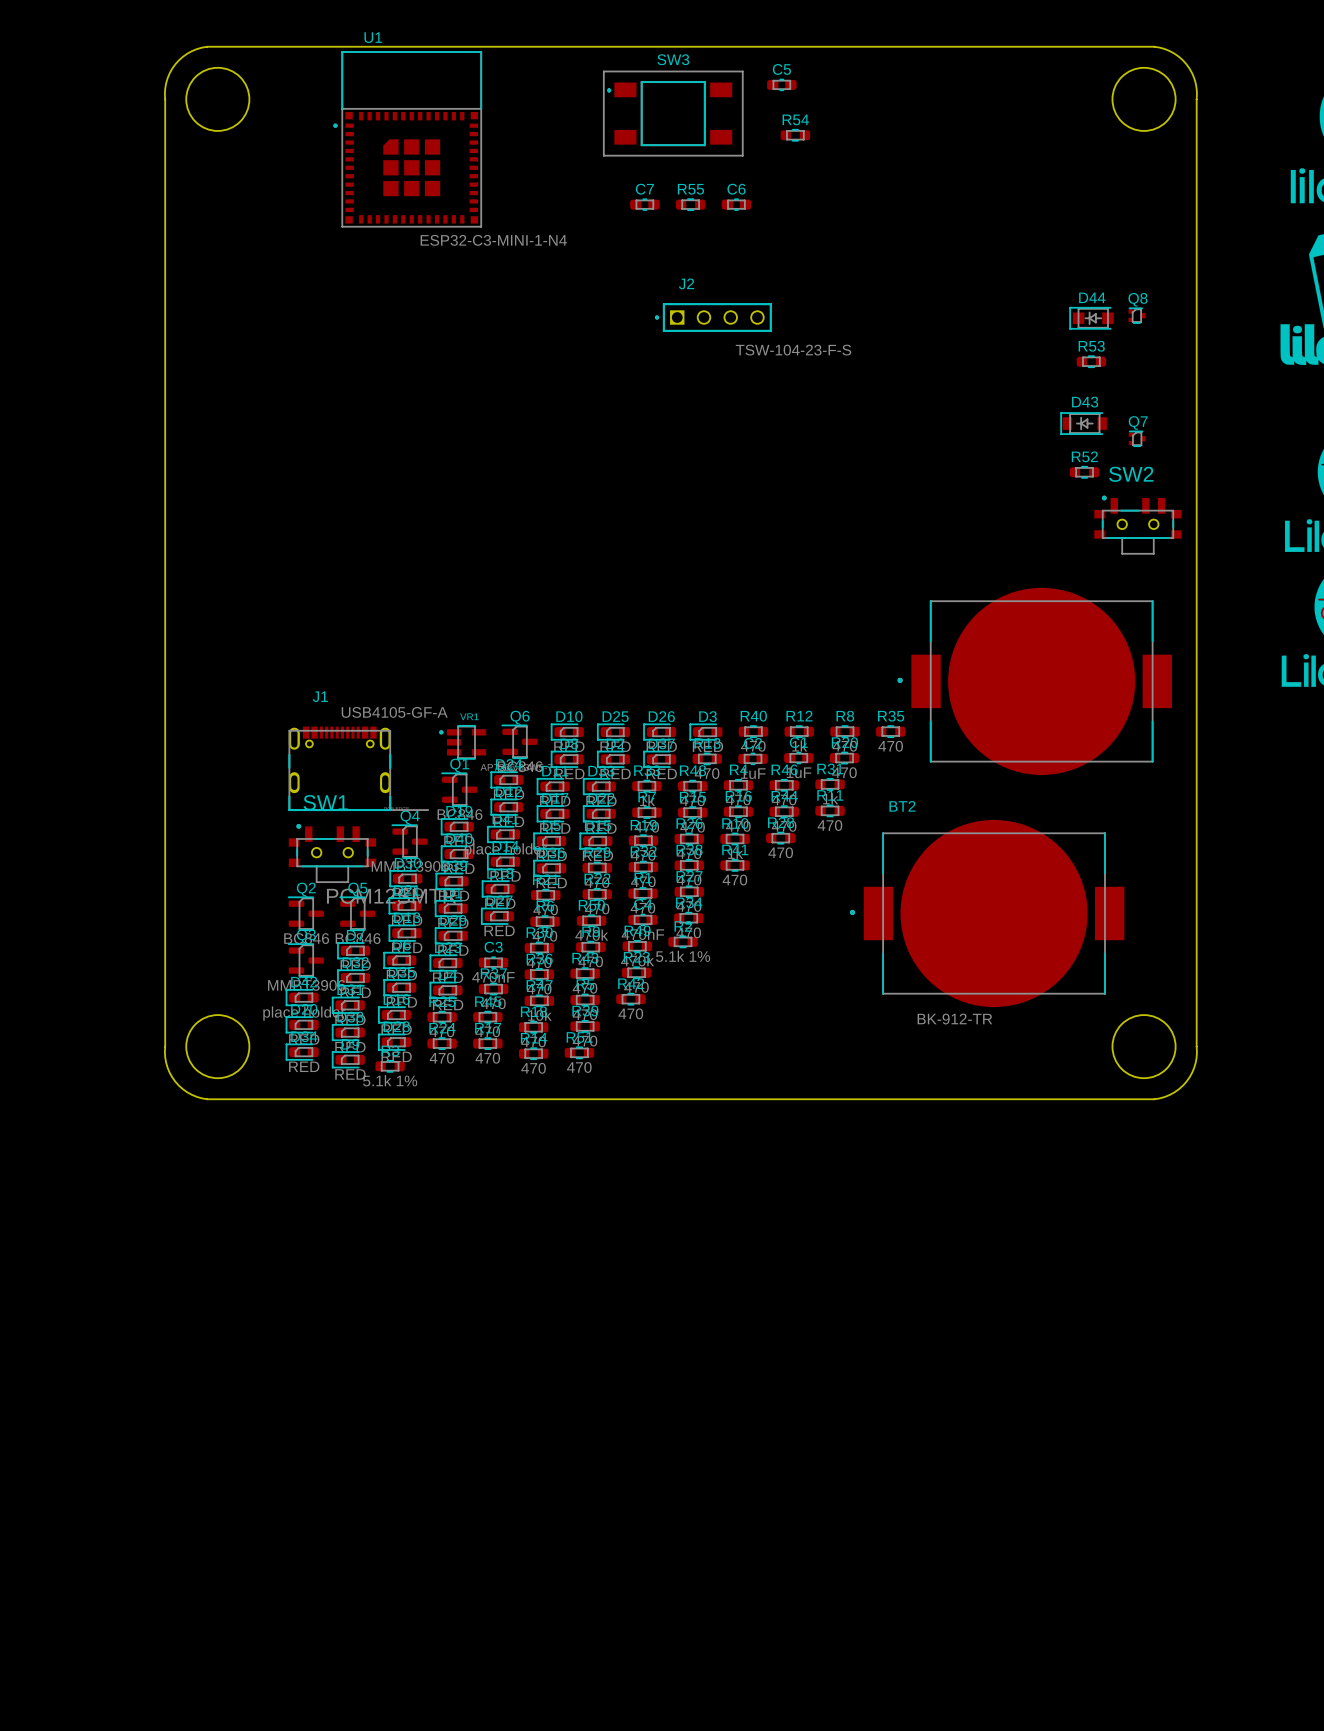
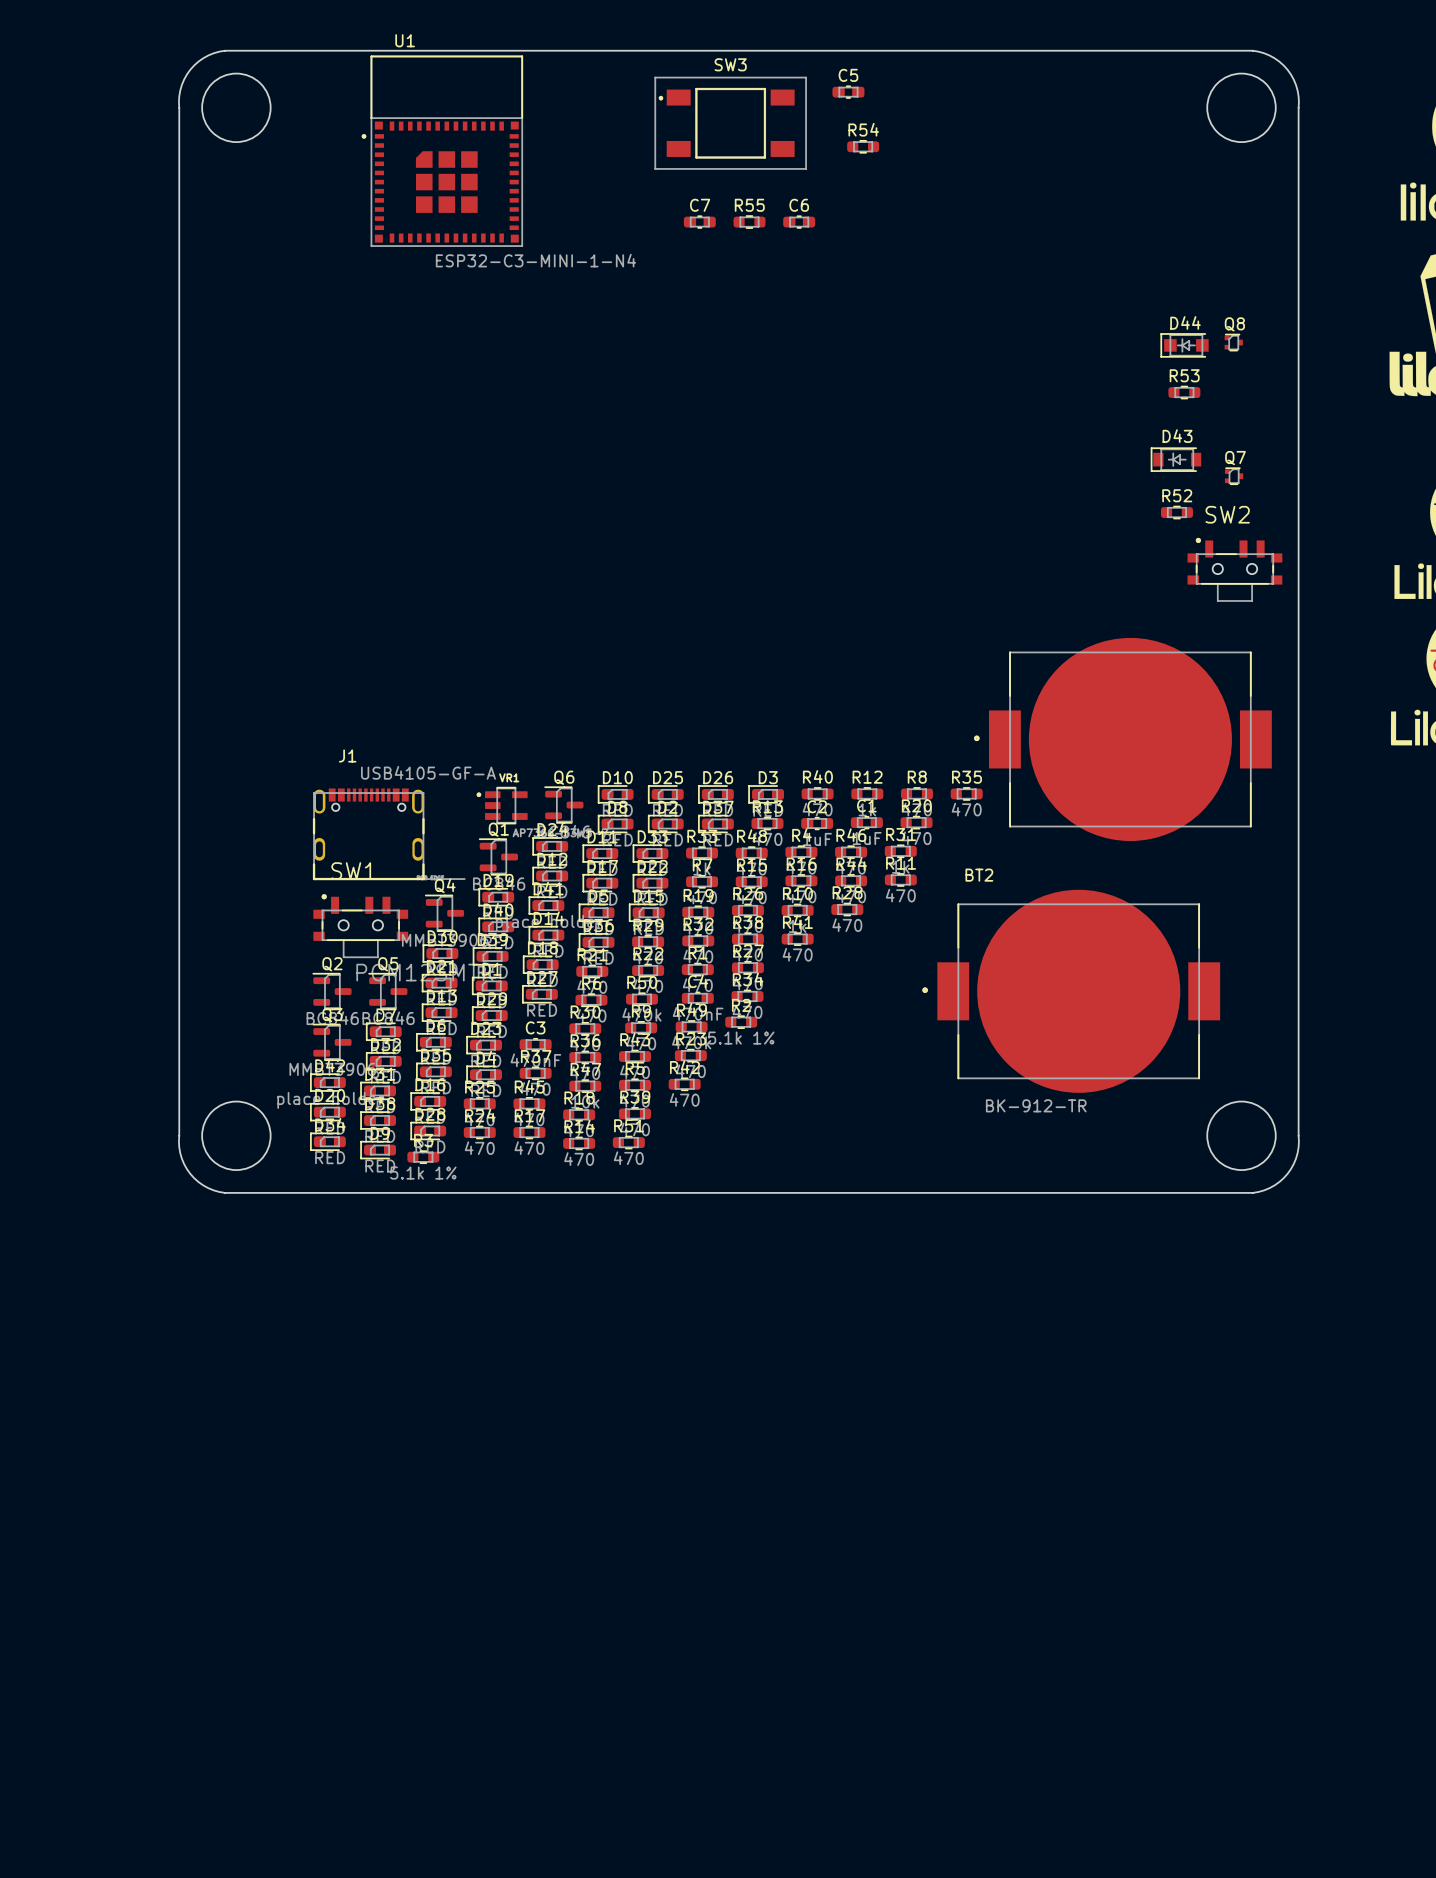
J2: TSW-104-23-F-S (713, 317) -> none

